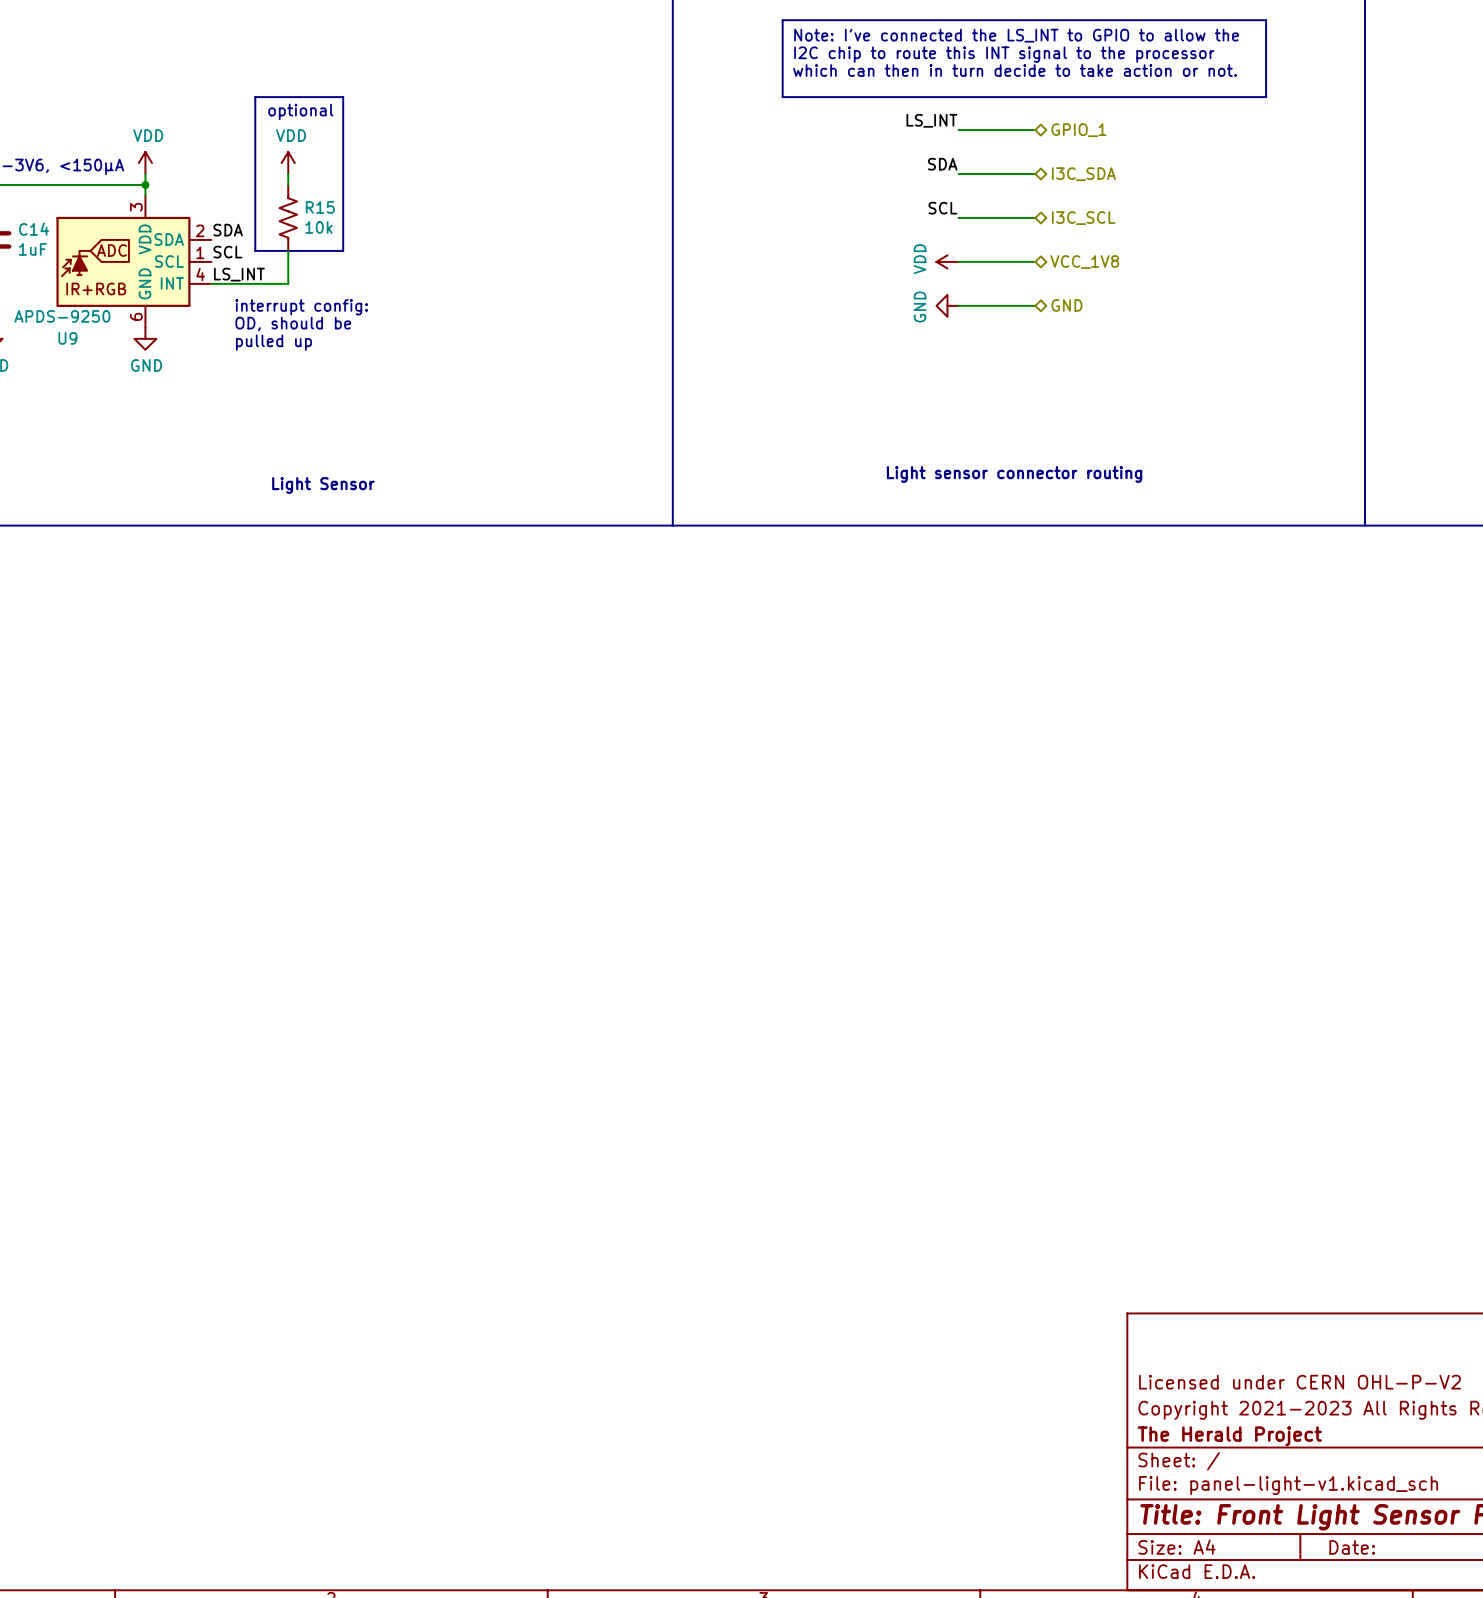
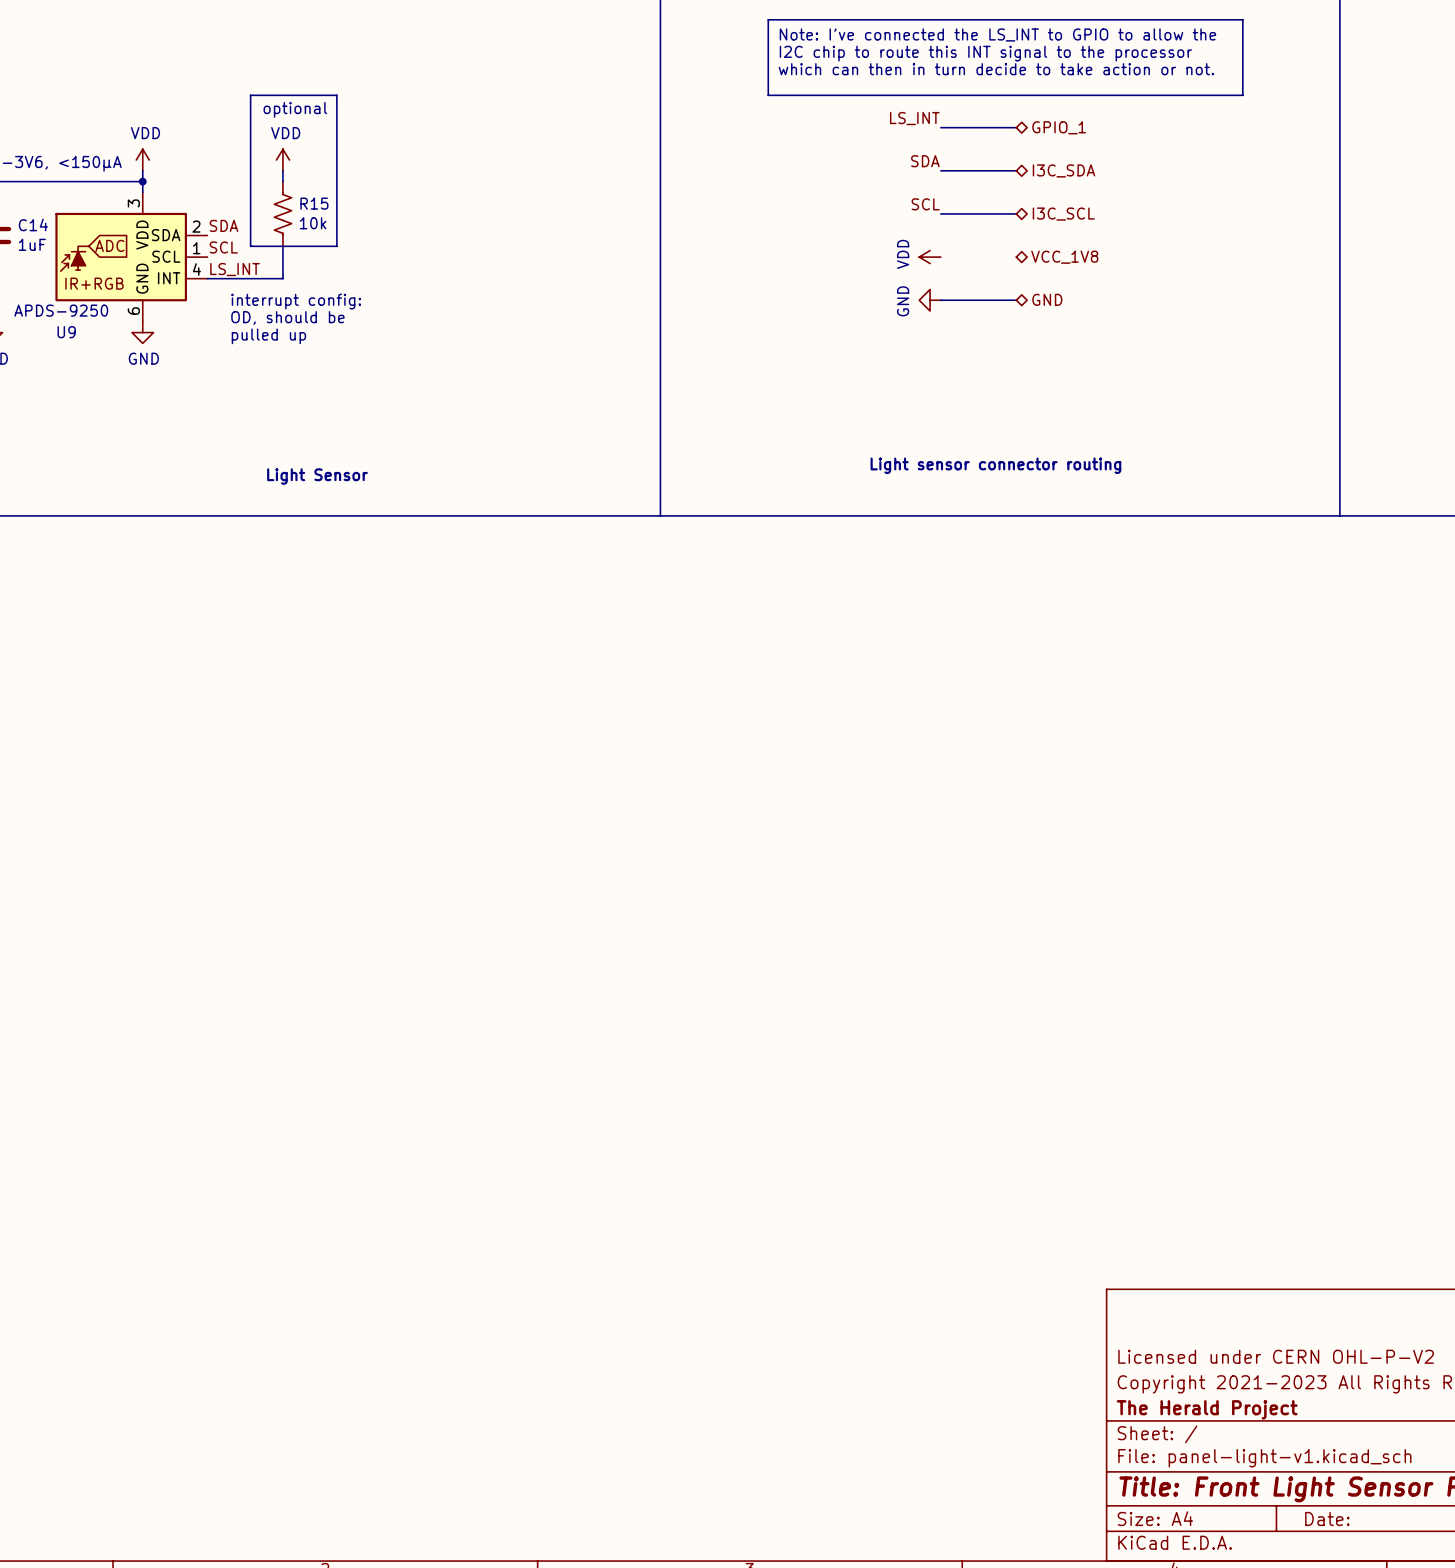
wire: (958, 261) (1035, 261) -> none

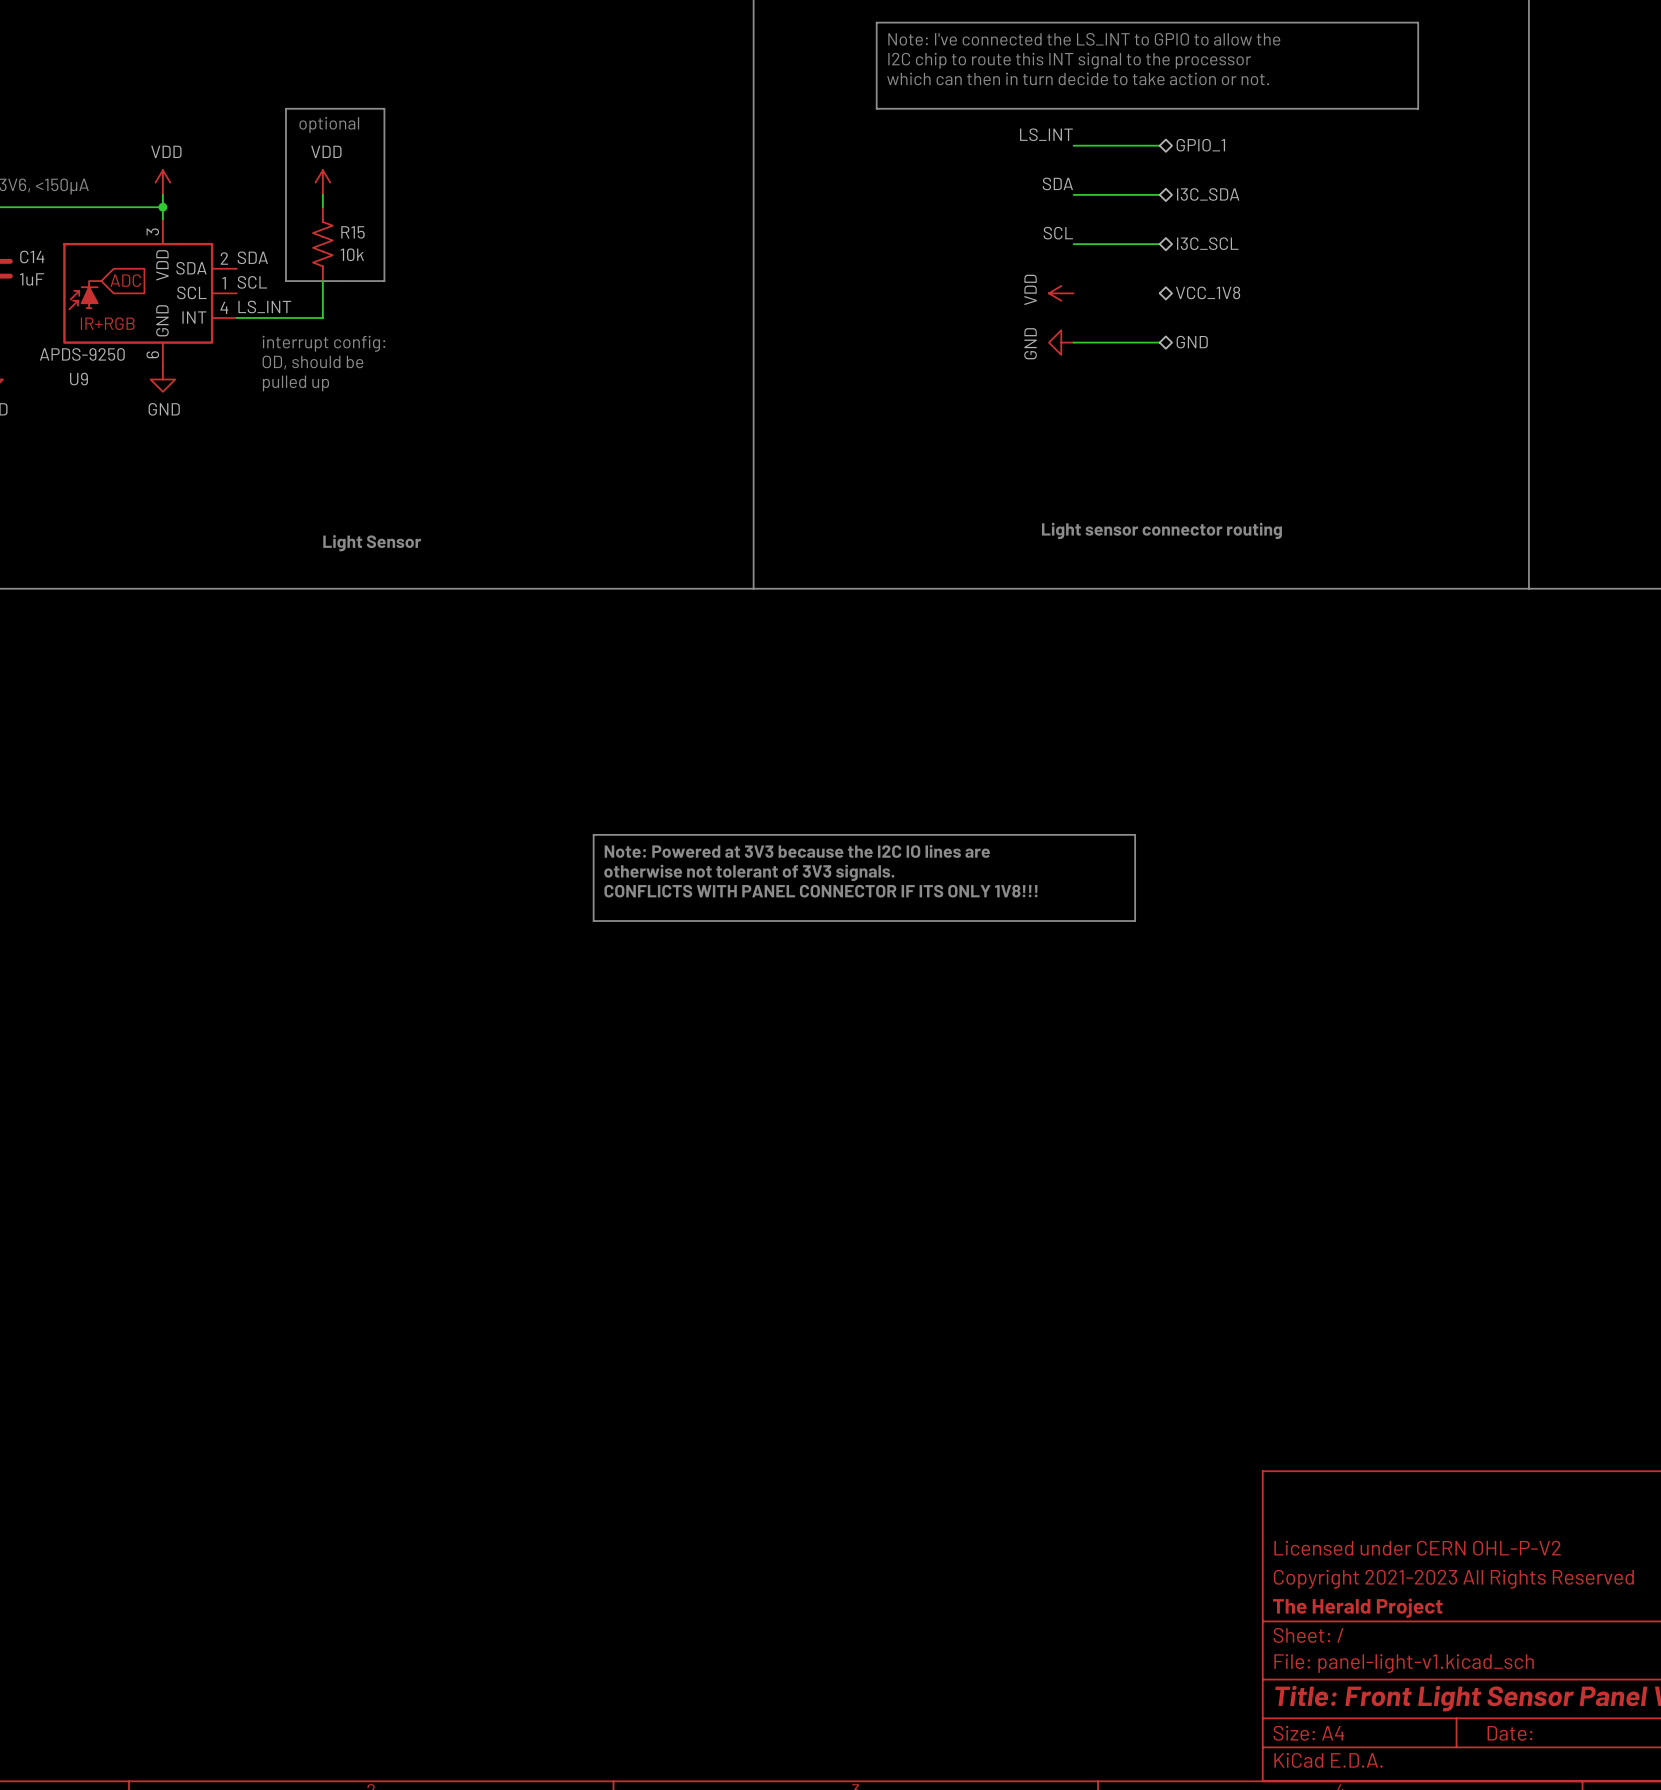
line: none -> (593, 834) (1135, 834) (1135, 921) (593, 921) (593, 834)
text: none -> Note: Powered at 3V3 because the I2C IO lines are (797, 851)
text: none -> otherwise not tolerant of 3V3 signals. (749, 872)
text: none -> CONFLICTS WITH PANEL CONNECTOR IF ITS ONLY 1V8!!! (820, 891)

